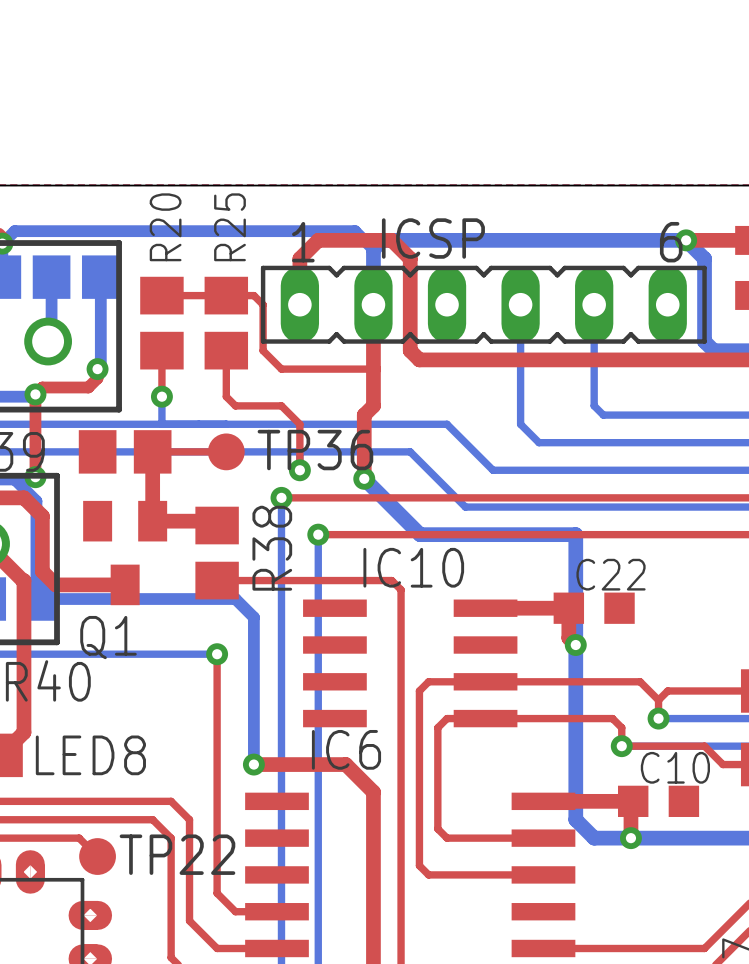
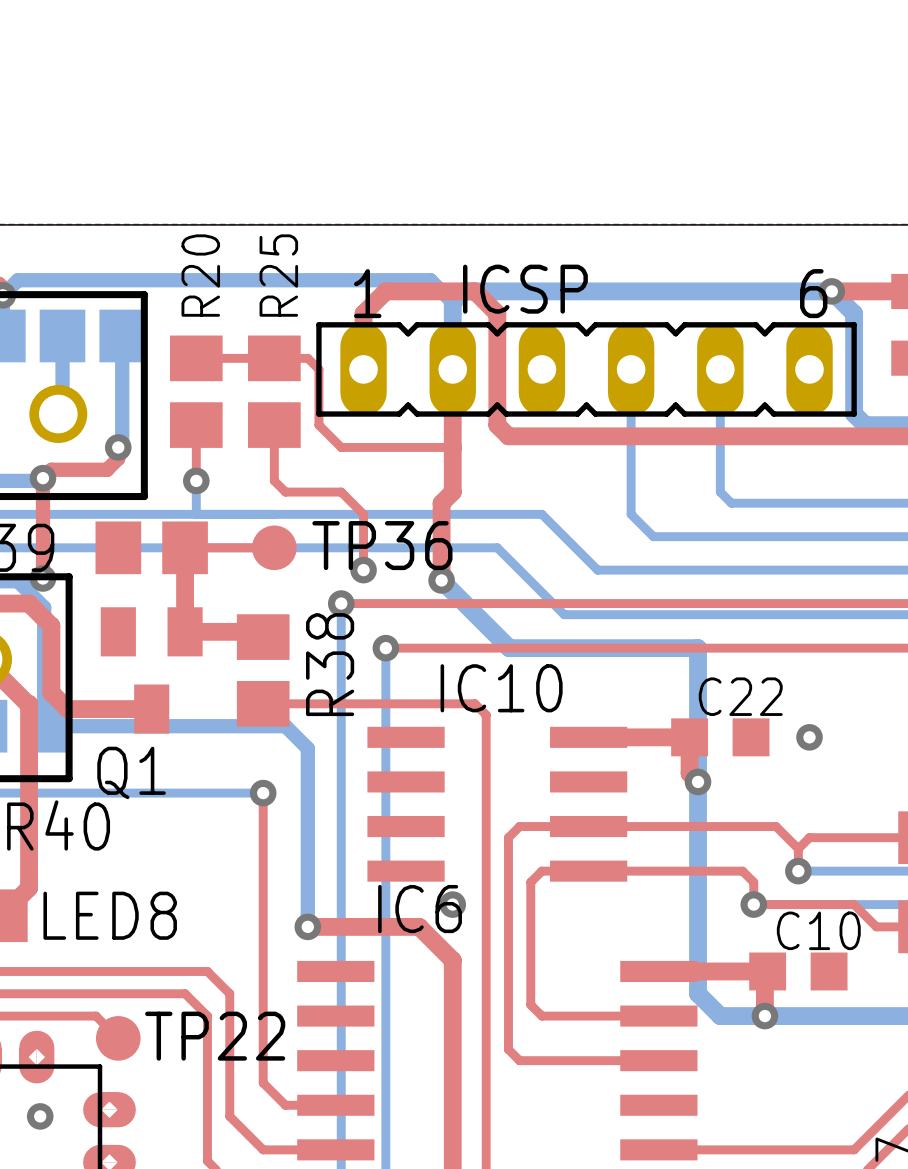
via: none -> (809, 737)
via: none -> (452, 904)
via: none -> (40, 1116)

